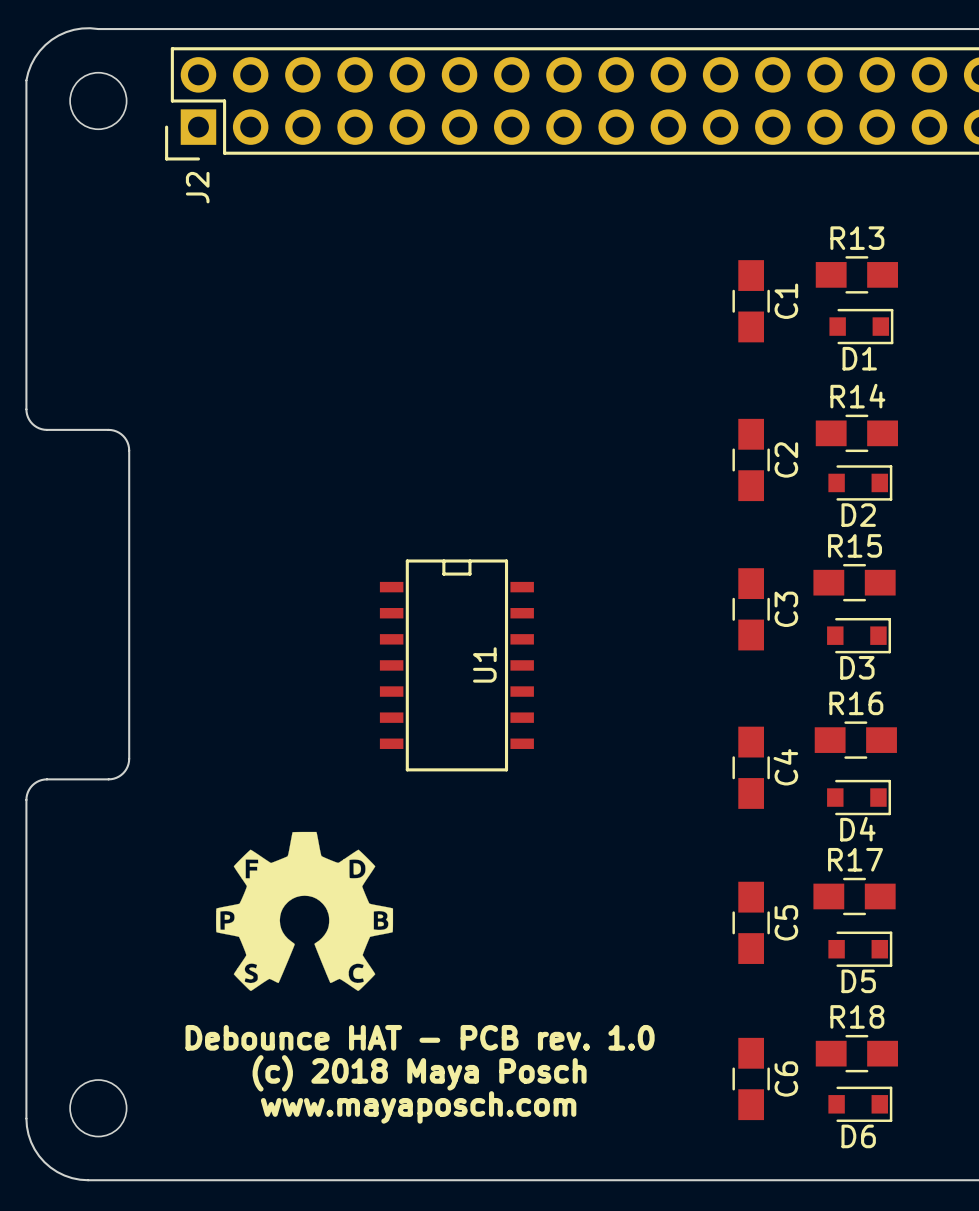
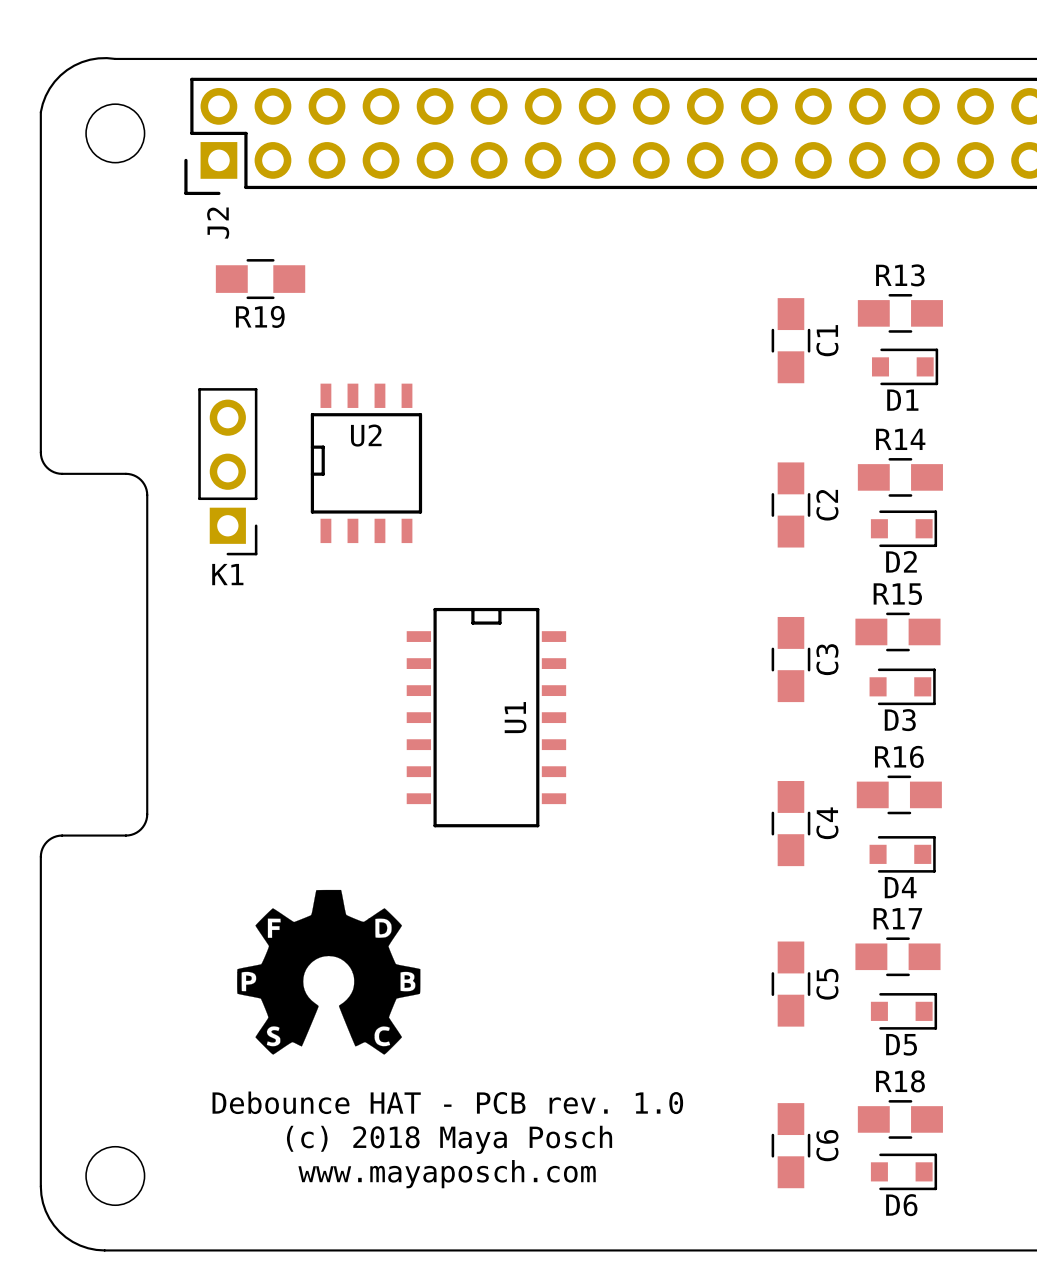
R19: none -> (260, 279)
U2: none -> (366, 463)
K1: none -> (227, 471)

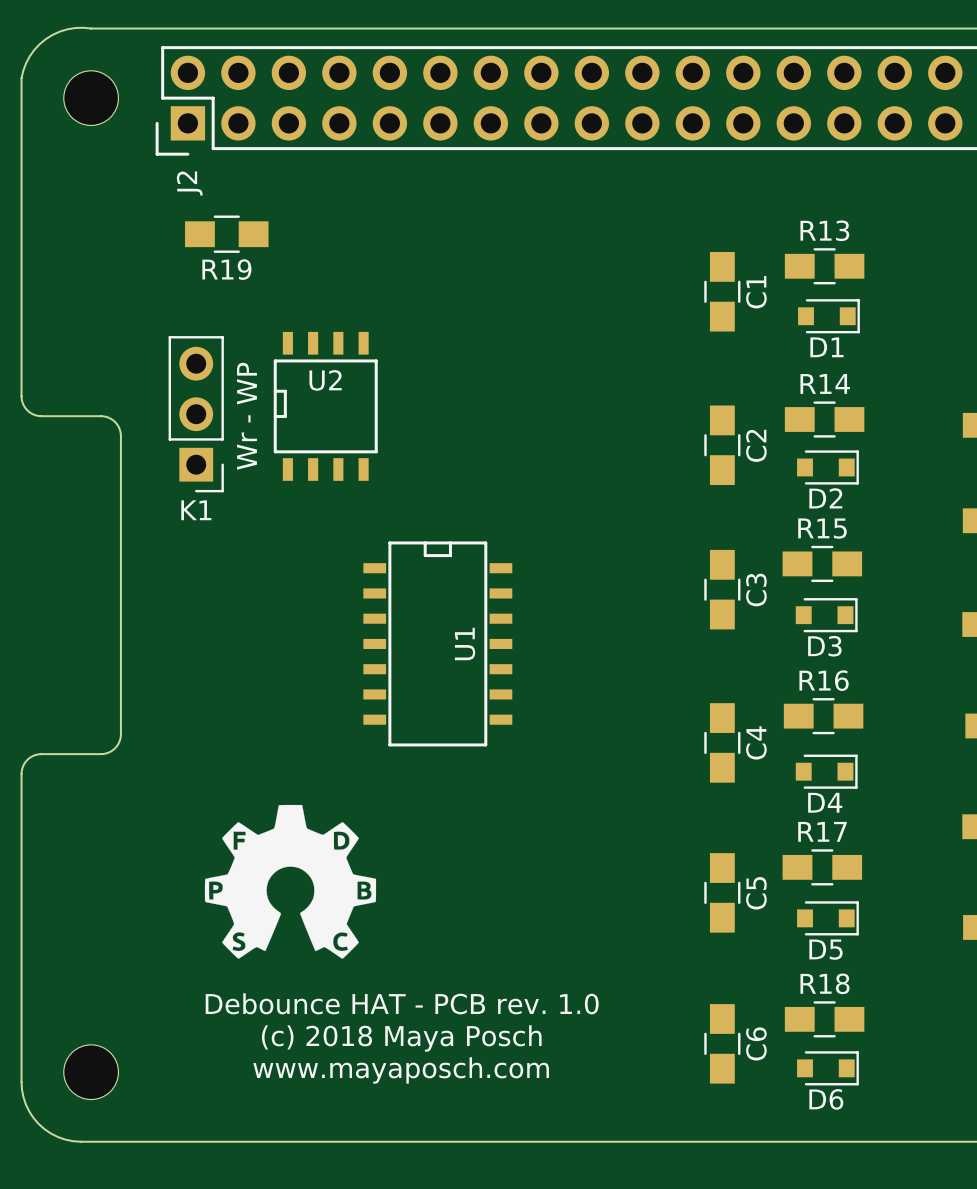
text: none -> Wr - WP (246, 416)

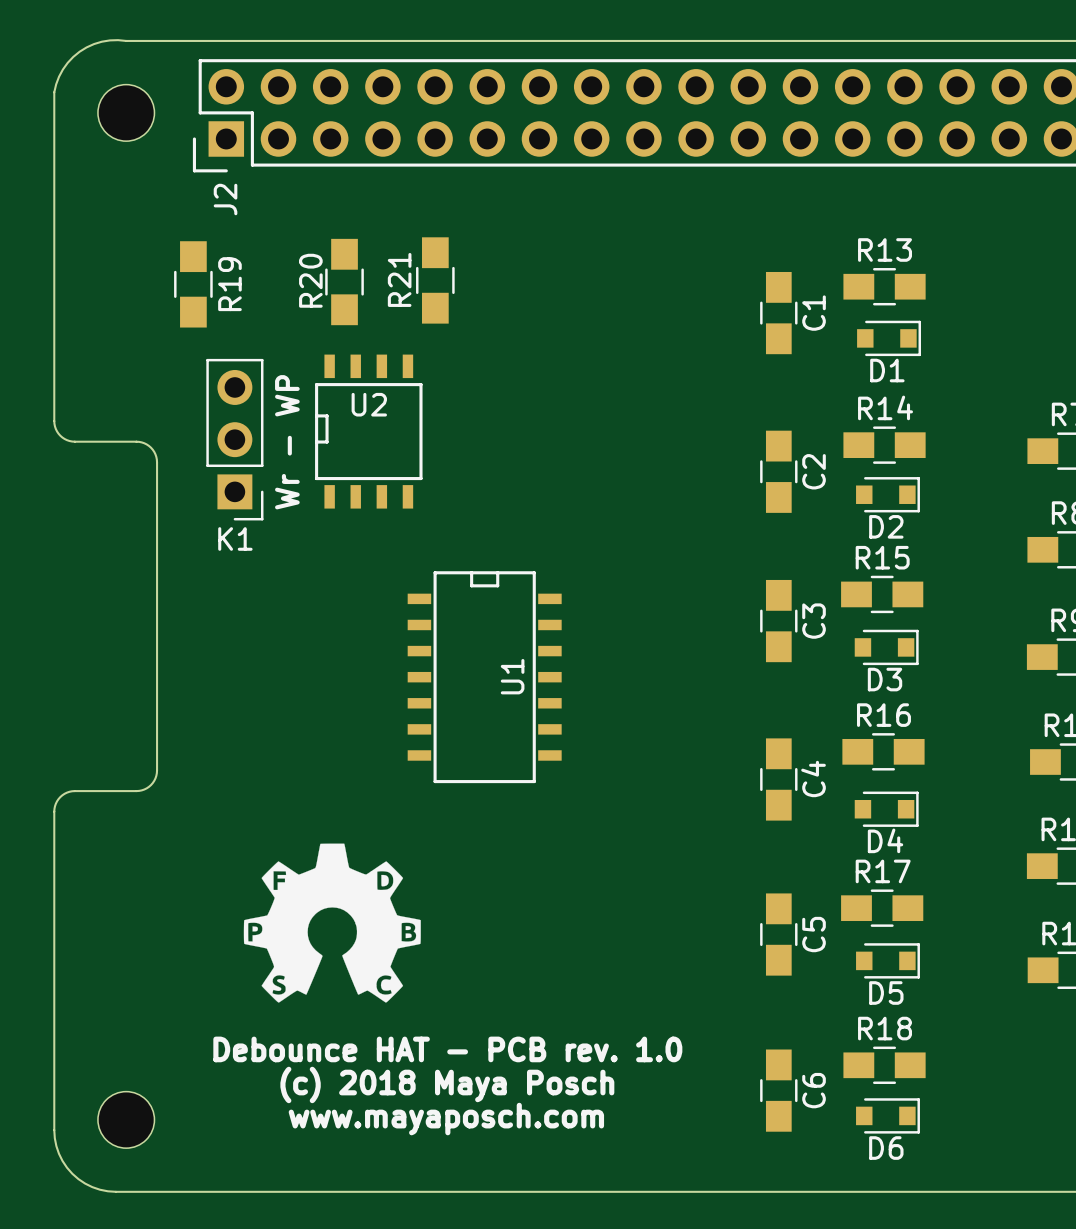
R19 rotation: 0° (226, 234) -> 90° clockwise (193, 284)
R19 position: (226, 234) -> (193, 284)
R21: none -> (435, 280)
R20: none -> (344, 282)
R19 name position: R19 (226, 269) -> R19 (229, 284)

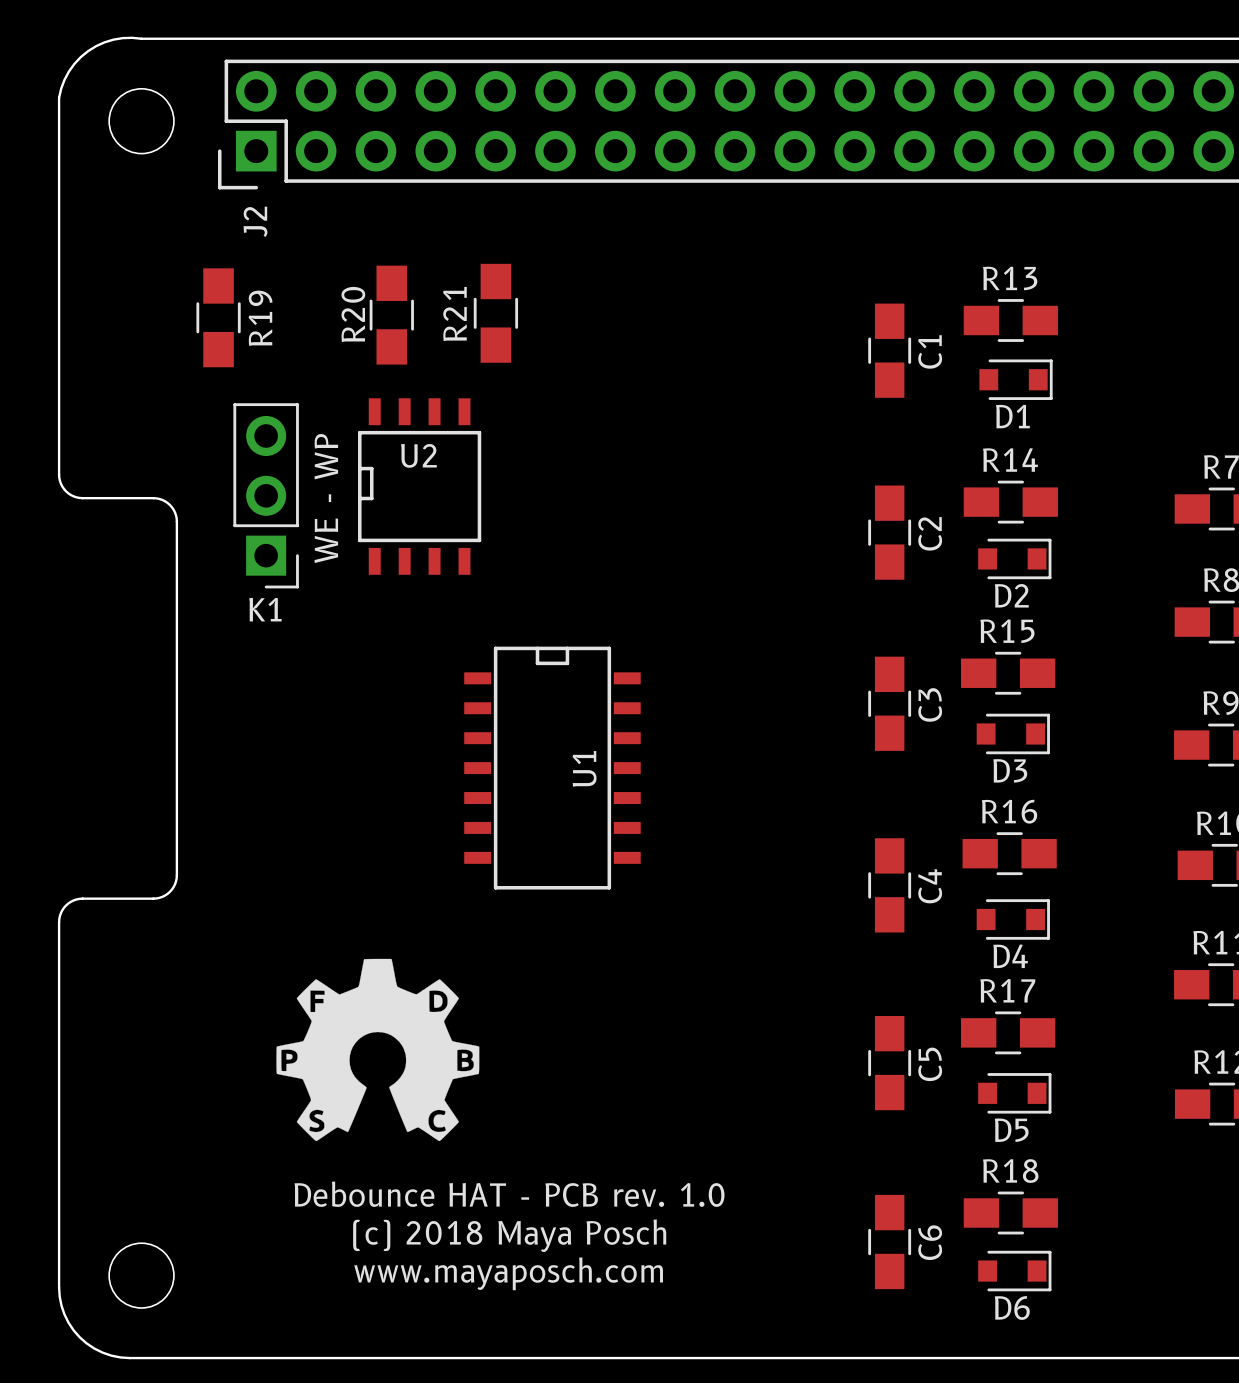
text: Wr - WP (287, 442) -> WE - WP (326, 498)

